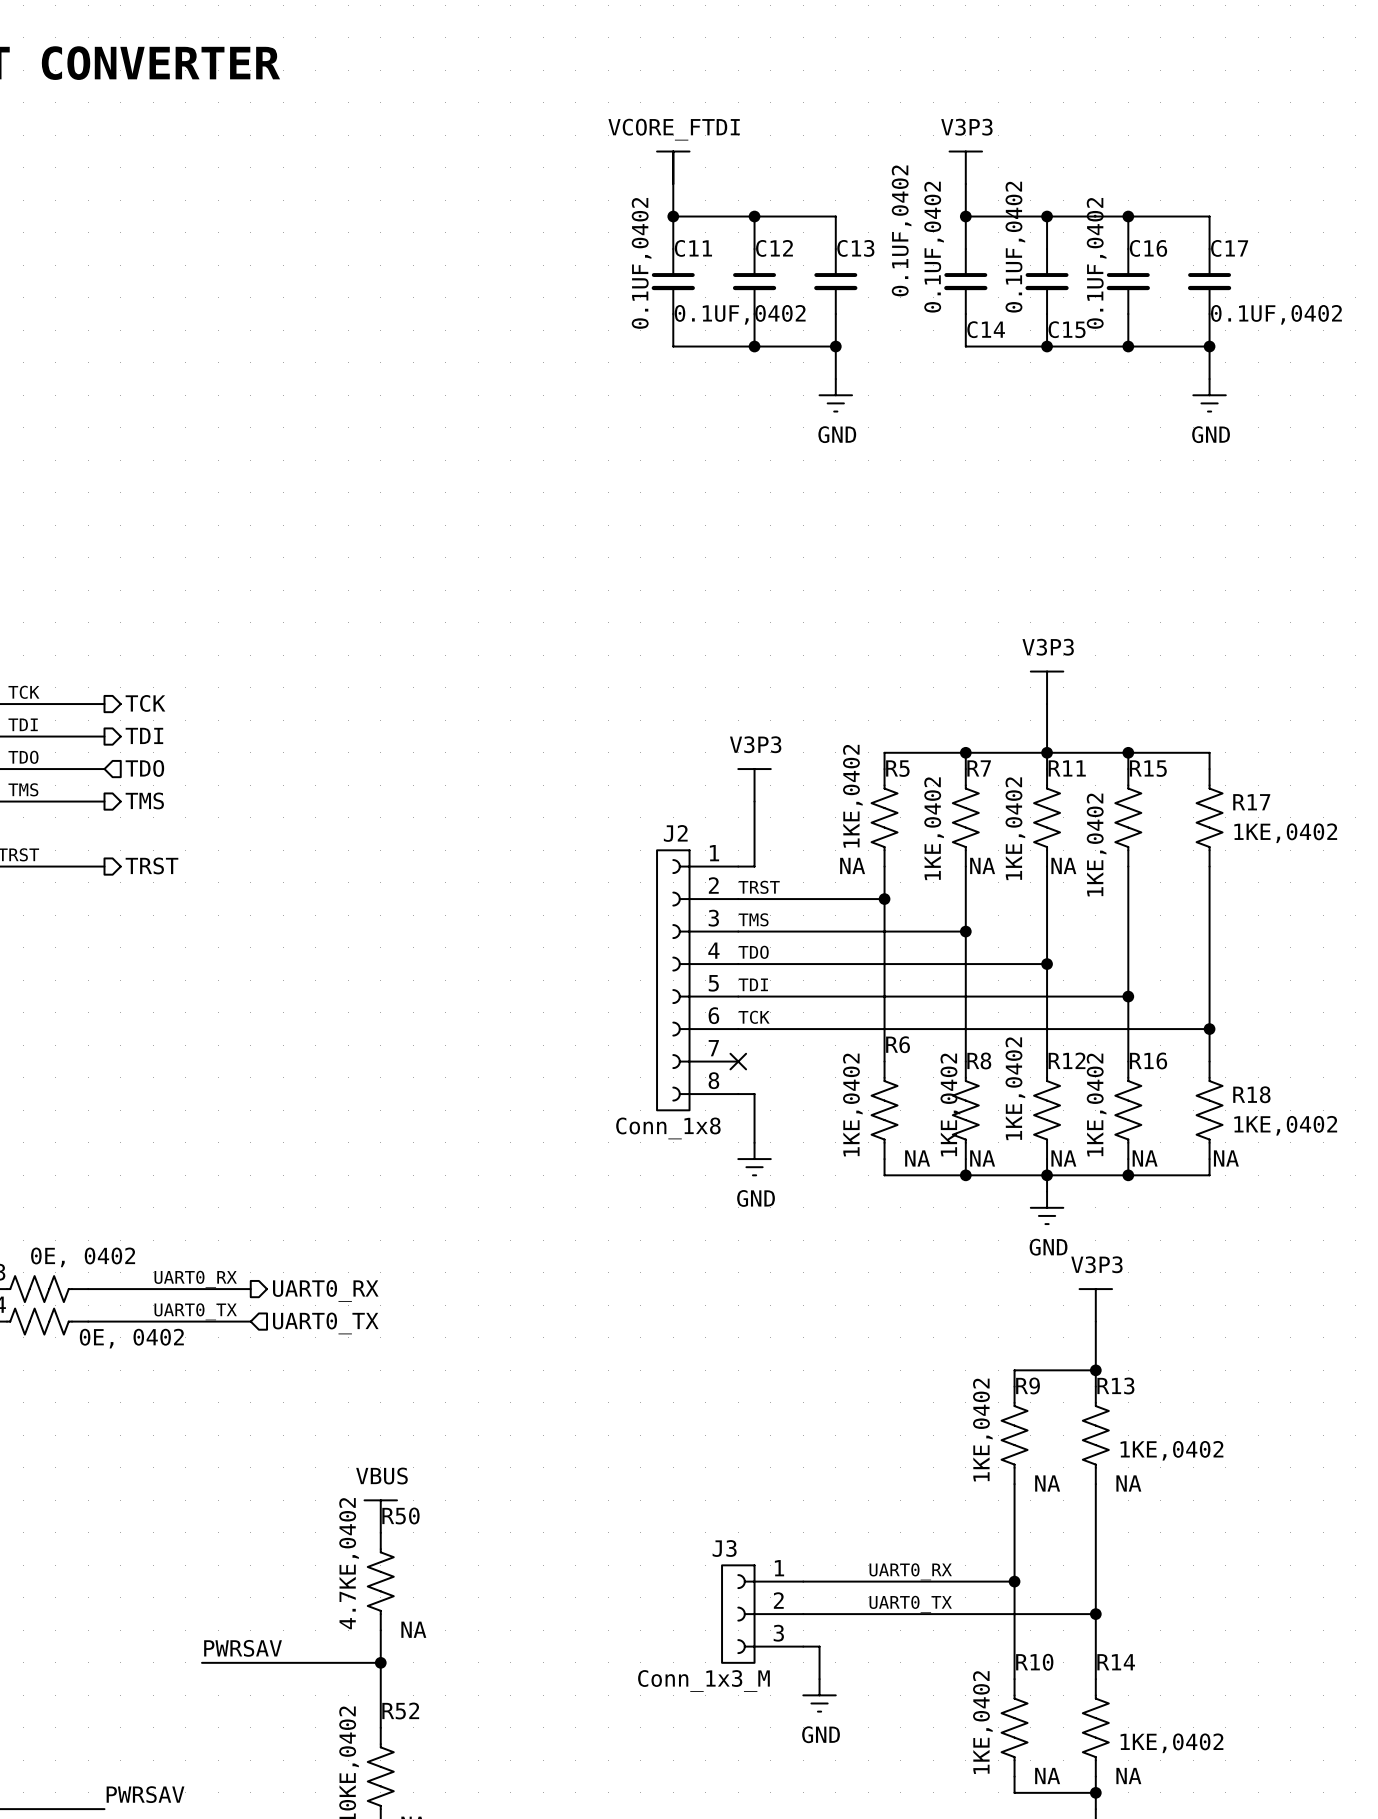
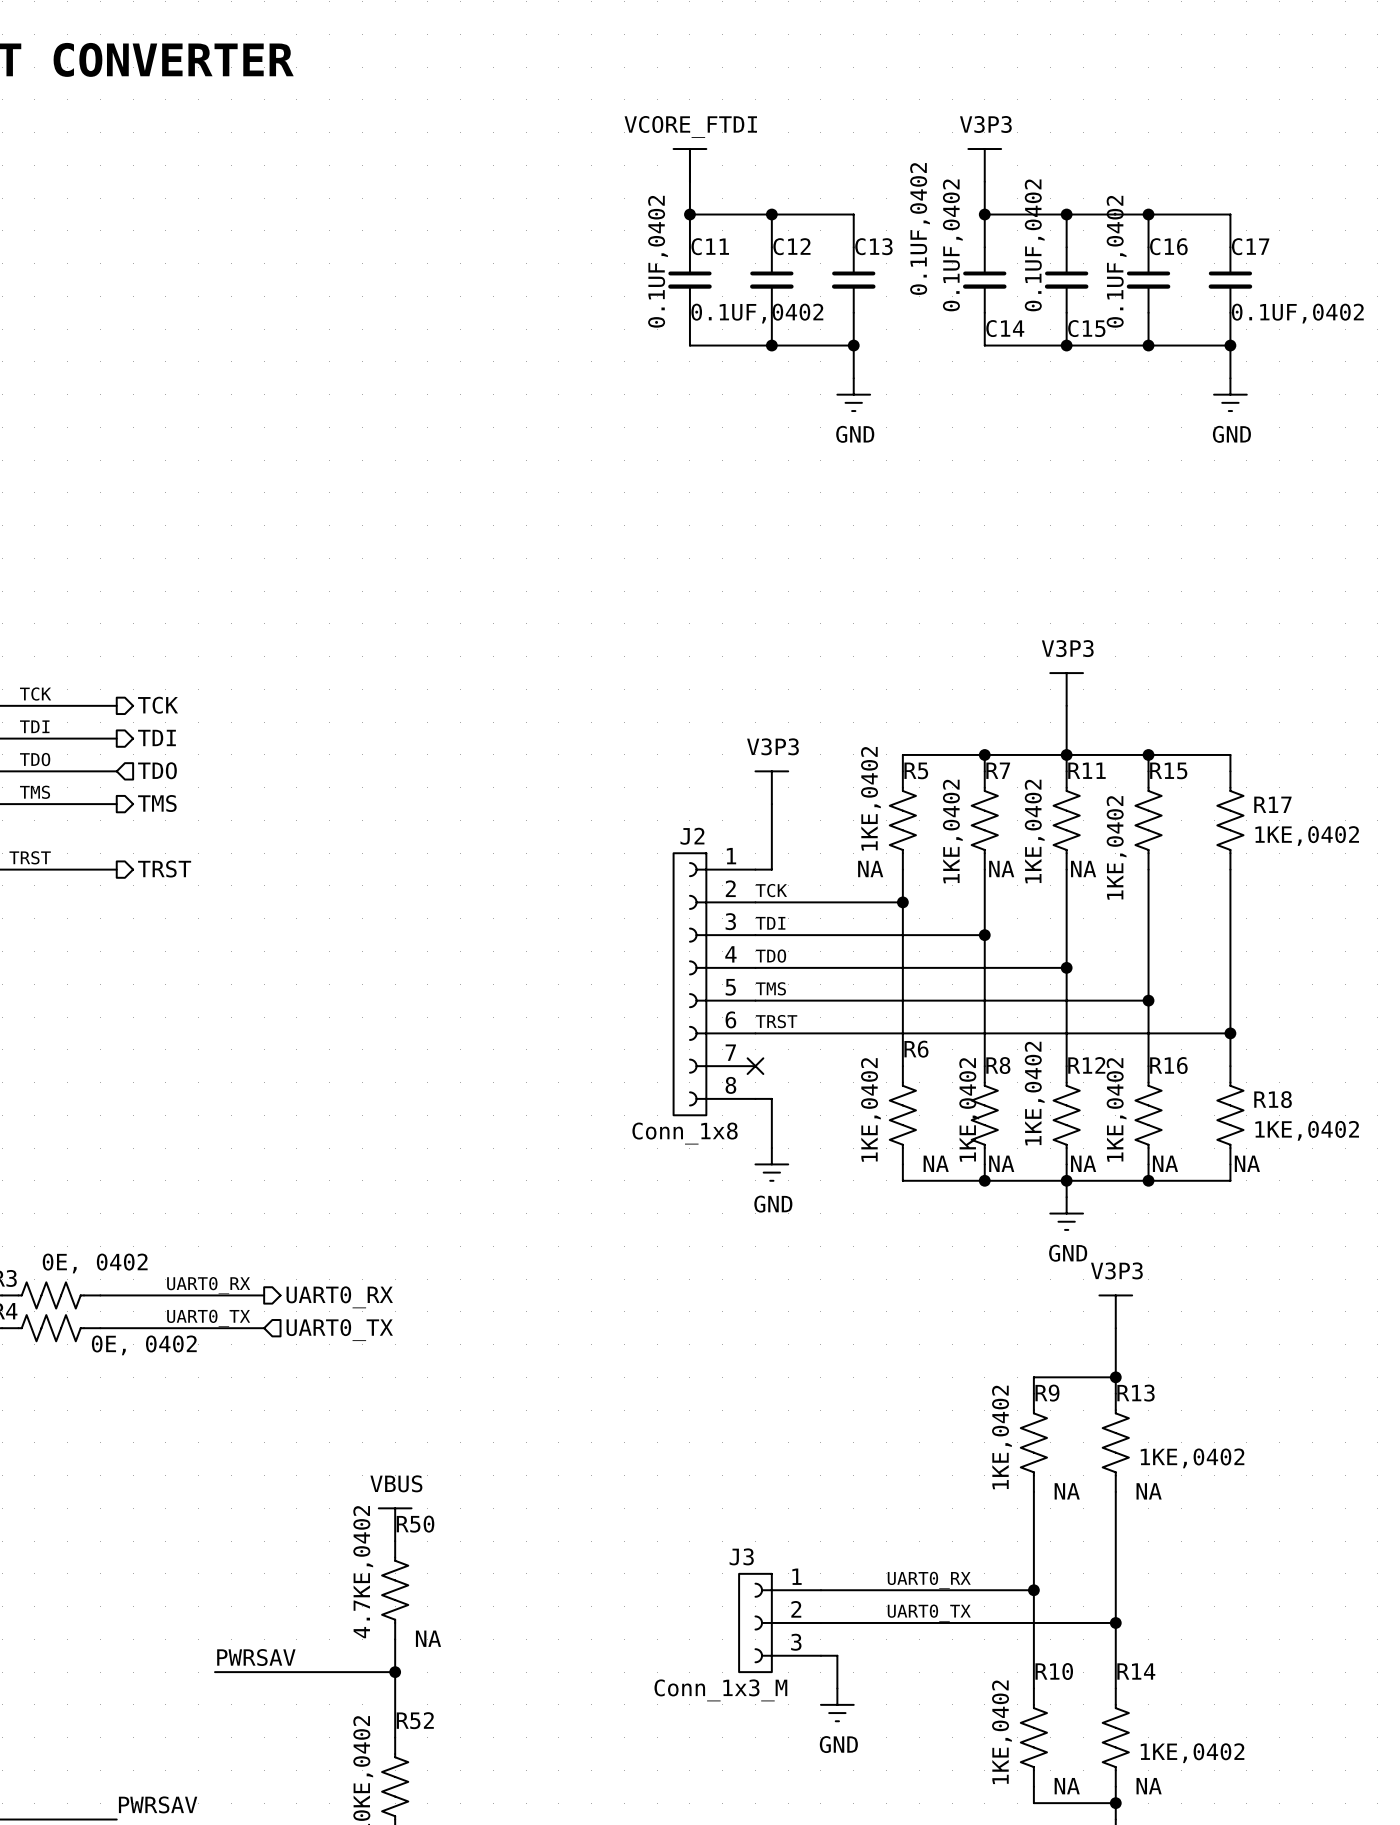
label: TRST (759, 887) -> TCK (771, 890)
label: TMS (753, 919) -> TDI (770, 923)
label: TDI (753, 984) -> TMS (770, 988)
label: TCK (754, 1017) -> TRST (776, 1021)

